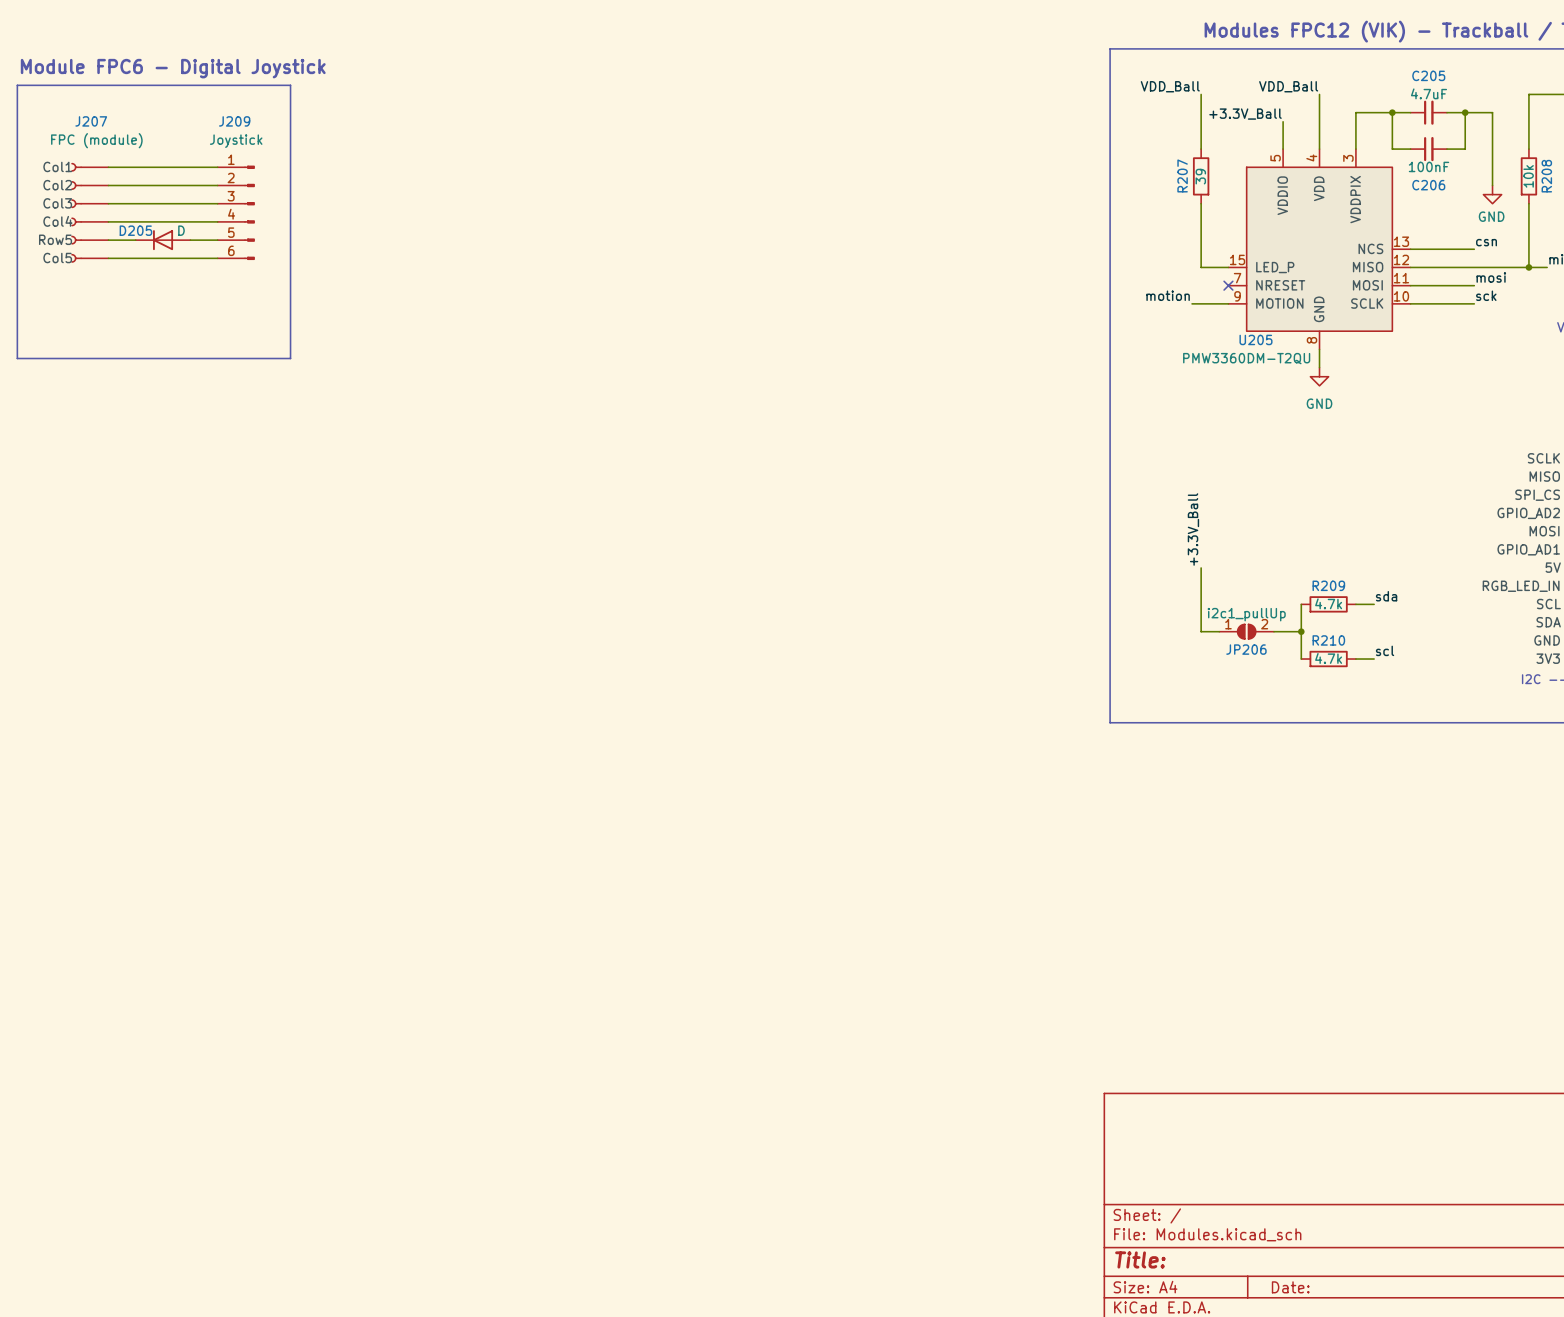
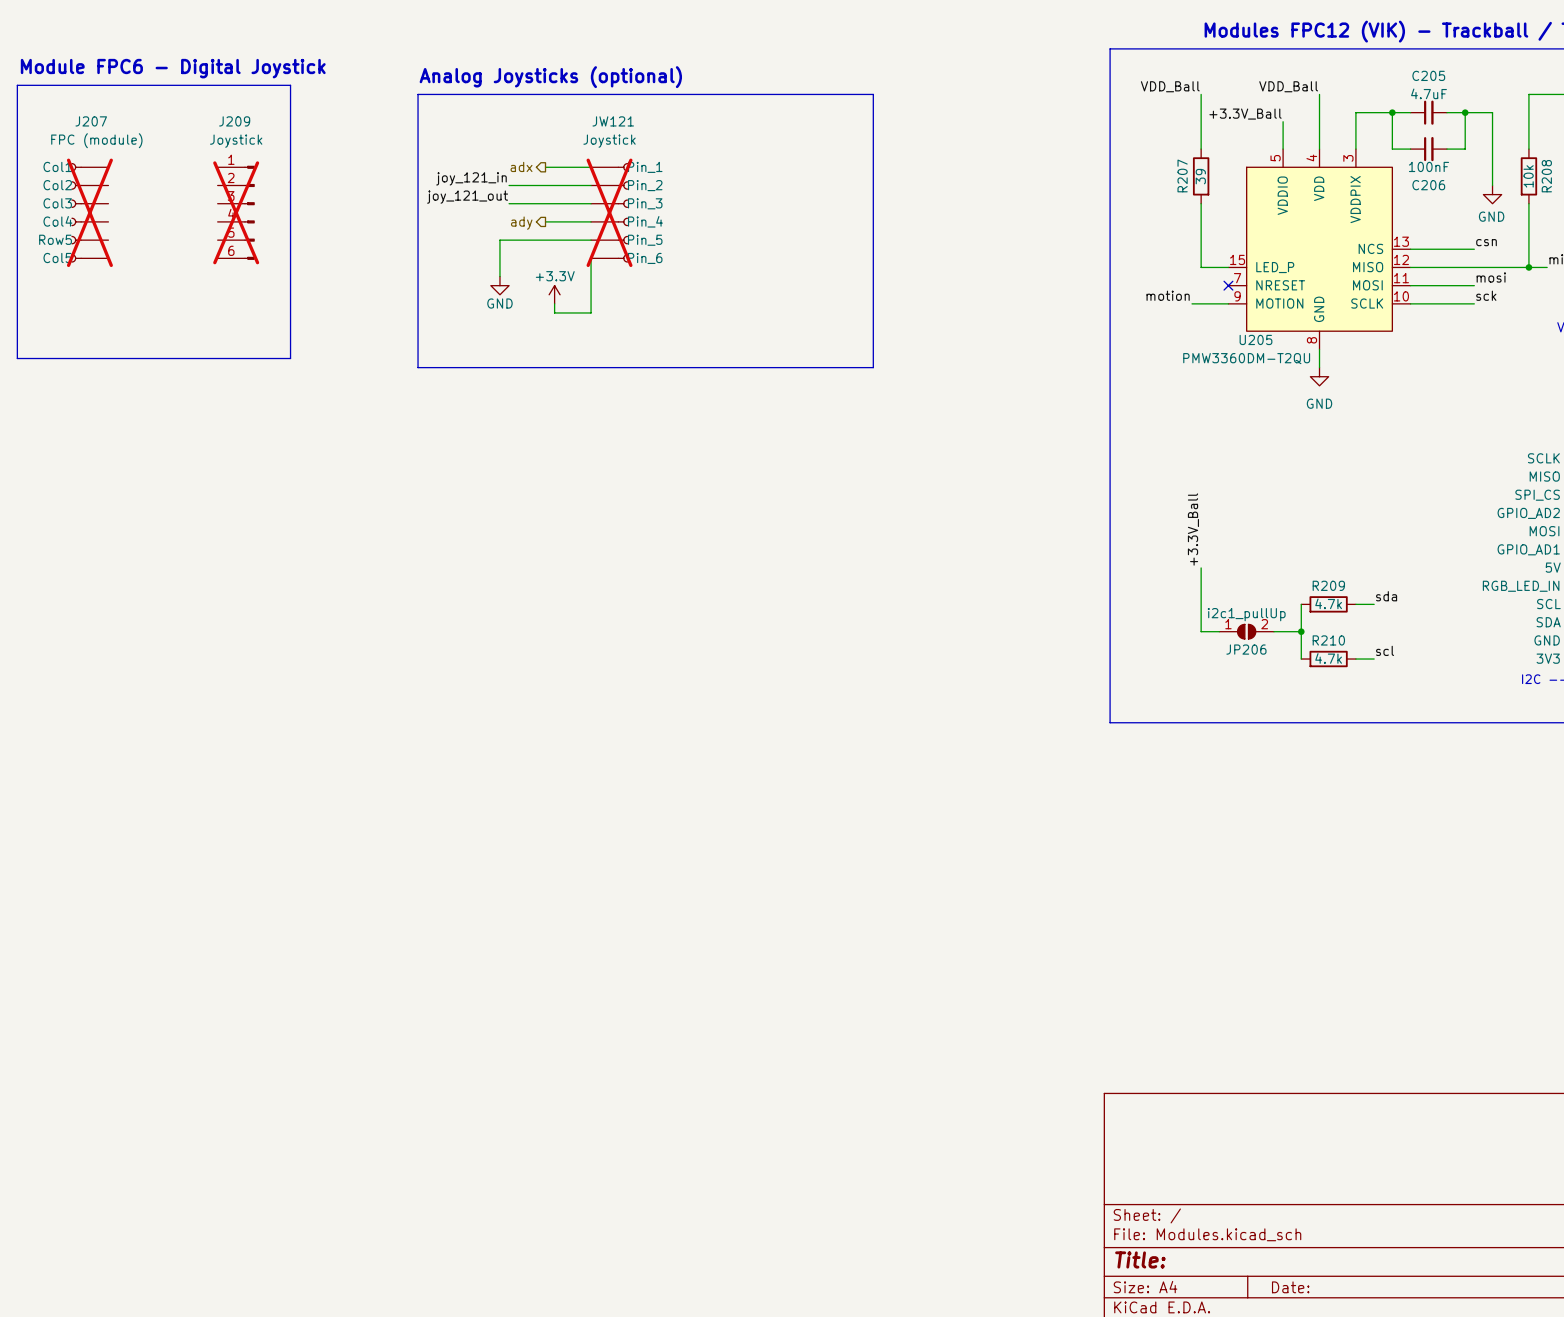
text: none -> Analog Joysticks (optional) (550, 77)
line: none -> (418, 94) (873, 94) (873, 367) (418, 367) (418, 94)
hierarchical label: none -> adx (521, 166)
wire: (108, 167) (217, 167) -> none
wire: none -> (545, 167) (591, 167)
label: none -> joy_121_in (471, 178)
wire: (108, 185) (217, 185) -> none
wire: none -> (509, 185) (591, 185)
label: none -> joy_121_out (467, 197)
wire: (108, 203) (217, 203) -> none
wire: none -> (509, 203) (591, 203)
J207 do-not-place cross: none -> (89, 212)
J209 do-not-place cross: none -> (236, 212)
JW121: none -> Joystick (609, 212)
wire: (108, 221) (217, 221) -> none
wire: none -> (545, 221) (591, 221)
hierarchical label: none -> ady (521, 223)
wire: (108, 240) (135, 240) -> none
D205: D (163, 240) -> none
wire: (190, 240) (217, 240) -> none
wire: none -> (591, 240) (499, 240) (499, 276)
wire: (108, 258) (217, 258) -> none
wire: none -> (591, 258) (591, 312) (554, 312) (554, 303)
power symbol: none -> GND (499, 285)
power symbol: none -> +3.3V (554, 294)

